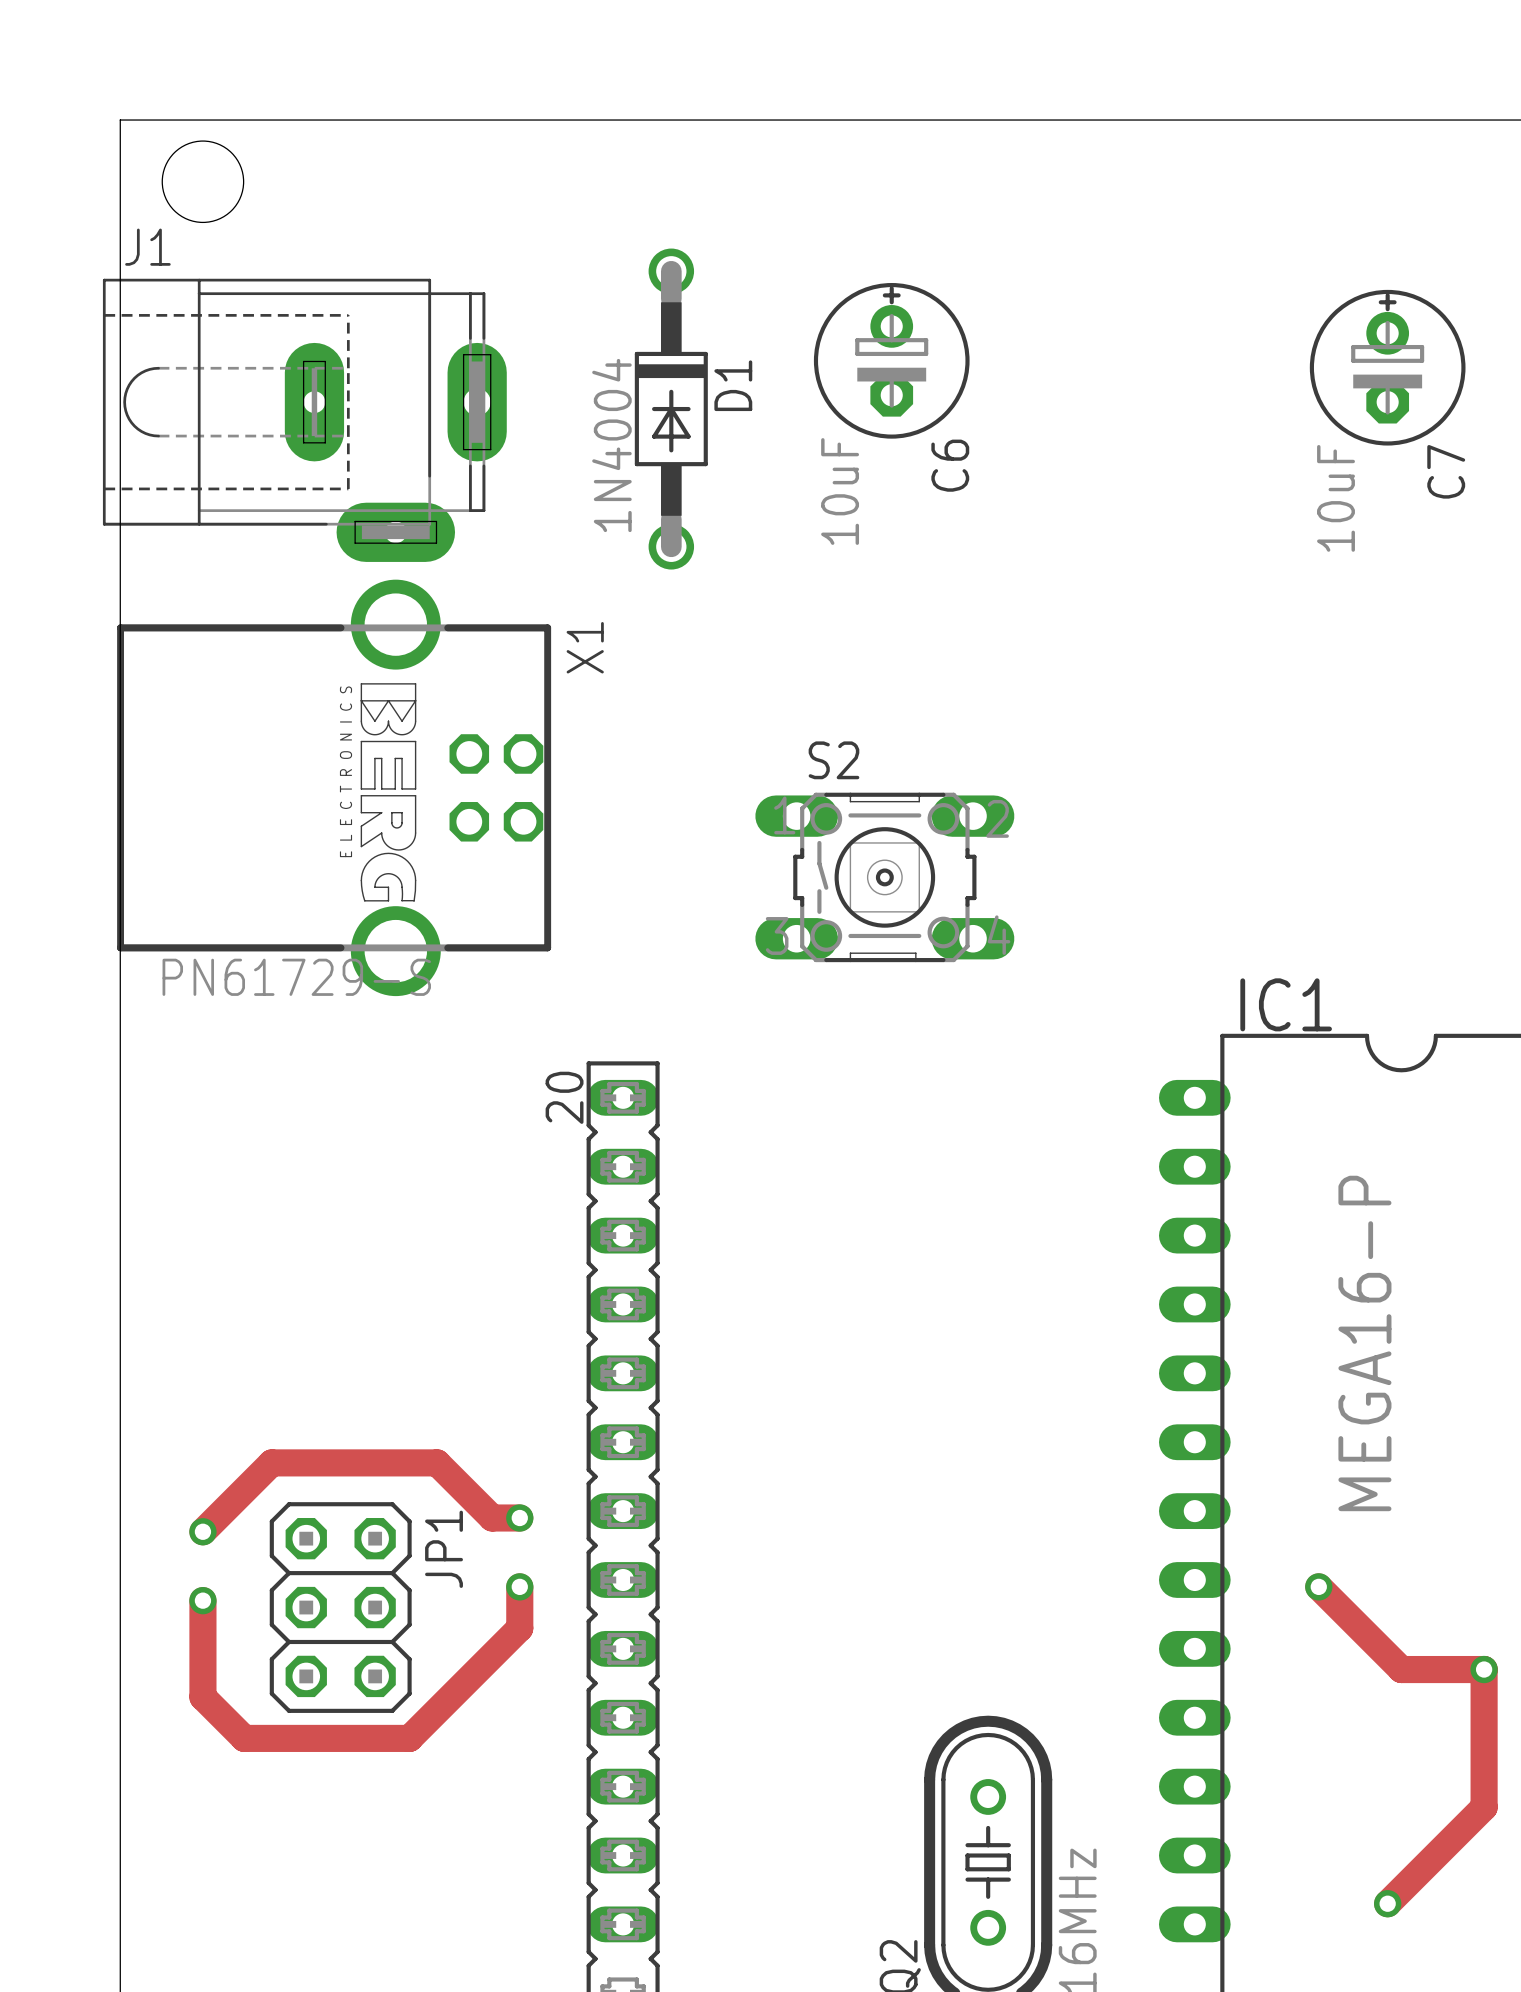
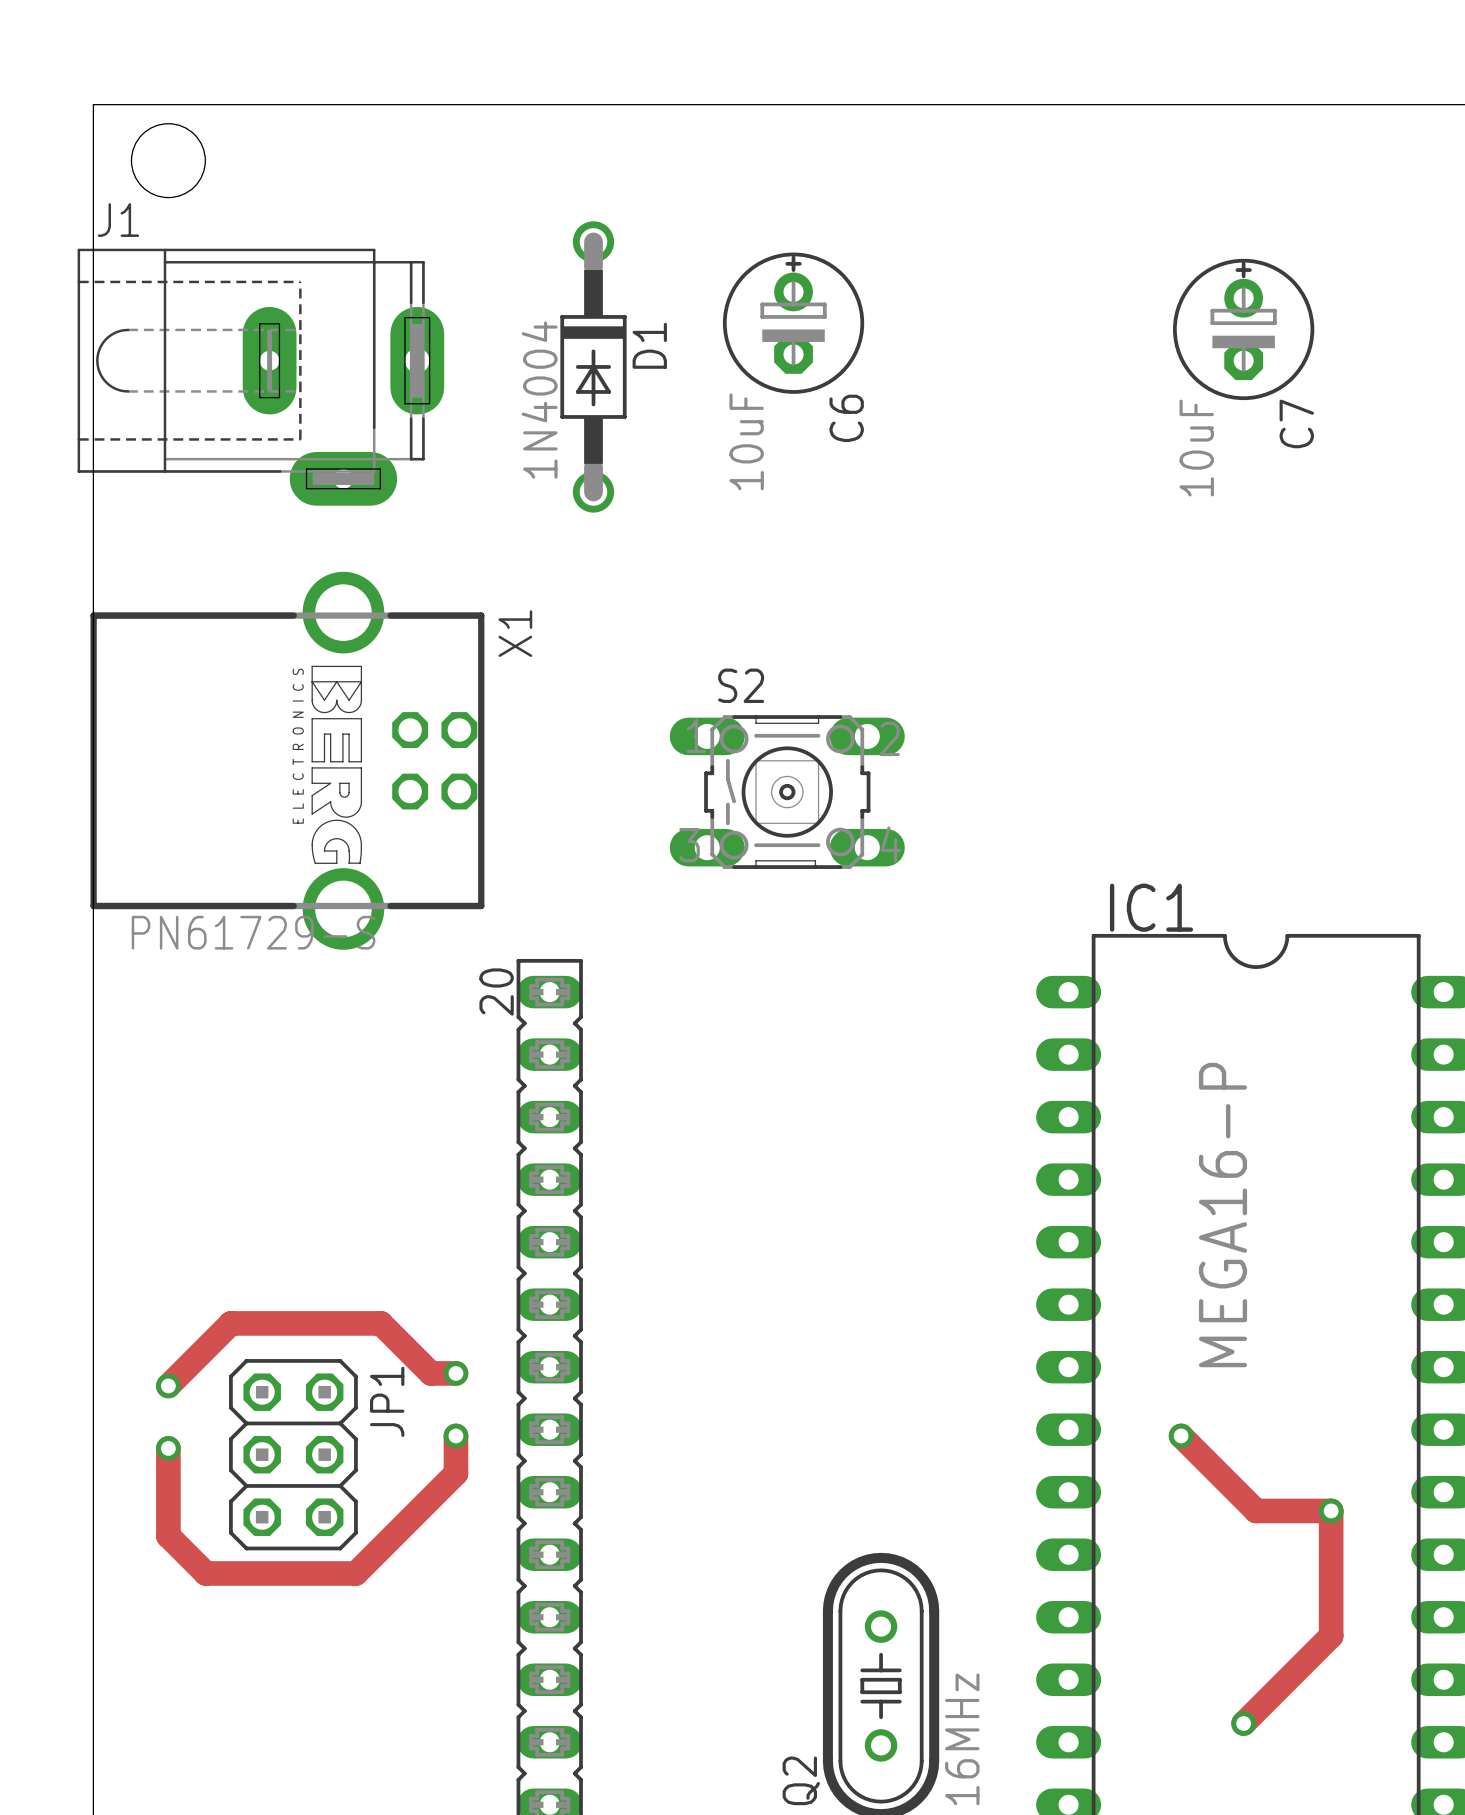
X1 position: (334, 787) -> (287, 760)

